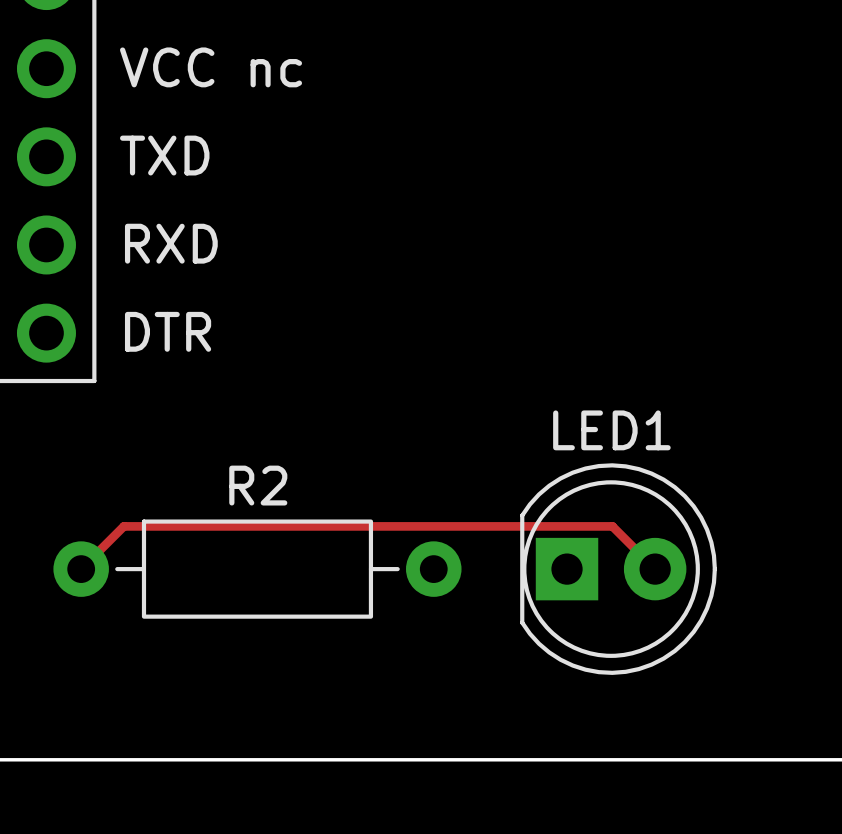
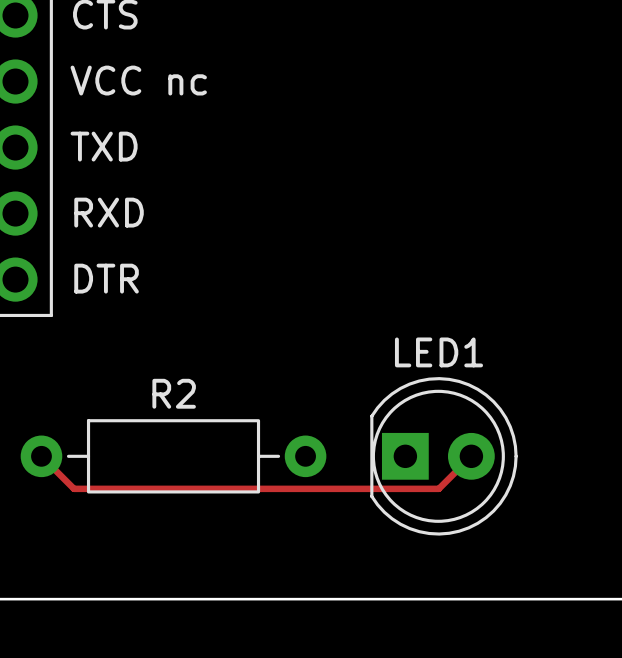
track: (81, 569) (123, 526) (612, 526) (655, 569) -> (41, 456) (74, 488) (438, 488) (471, 456)

